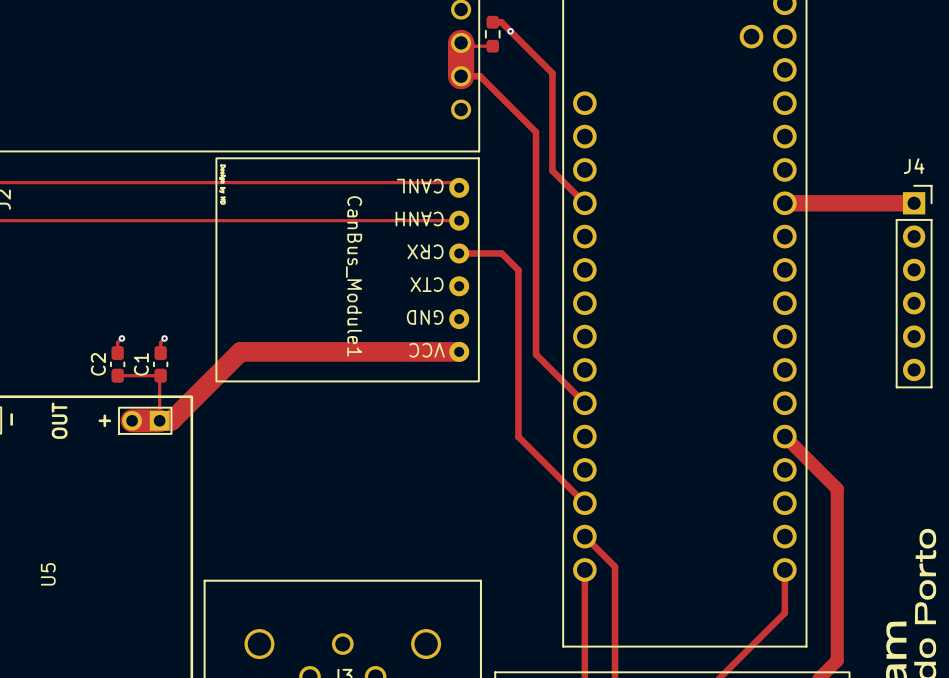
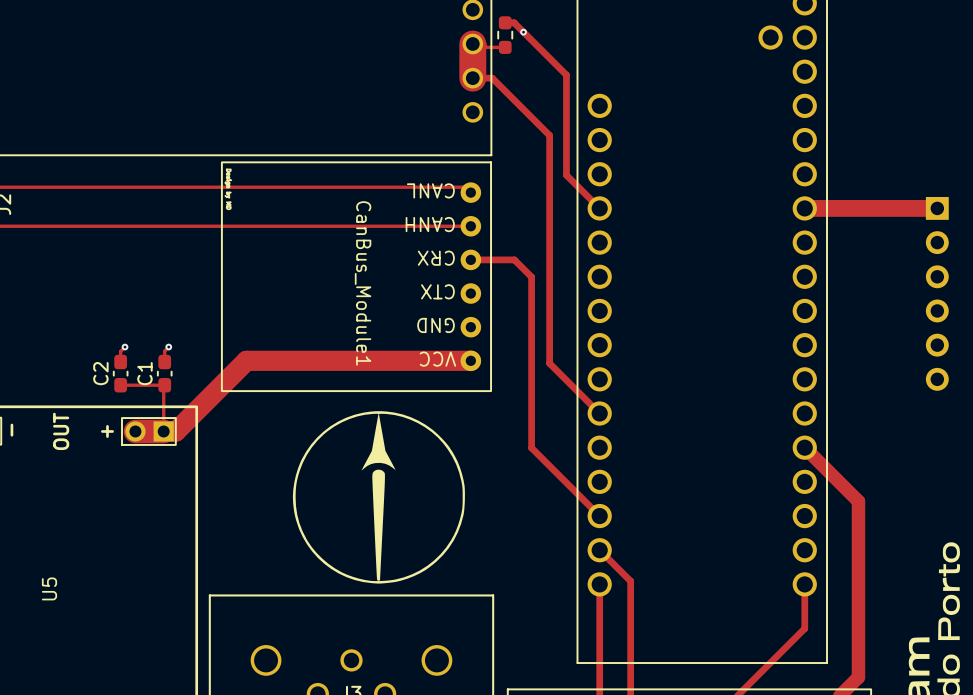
J4 side: top (914, 286) -> bottom (937, 293)
drawing: none -> [292, 411, 465, 584]

